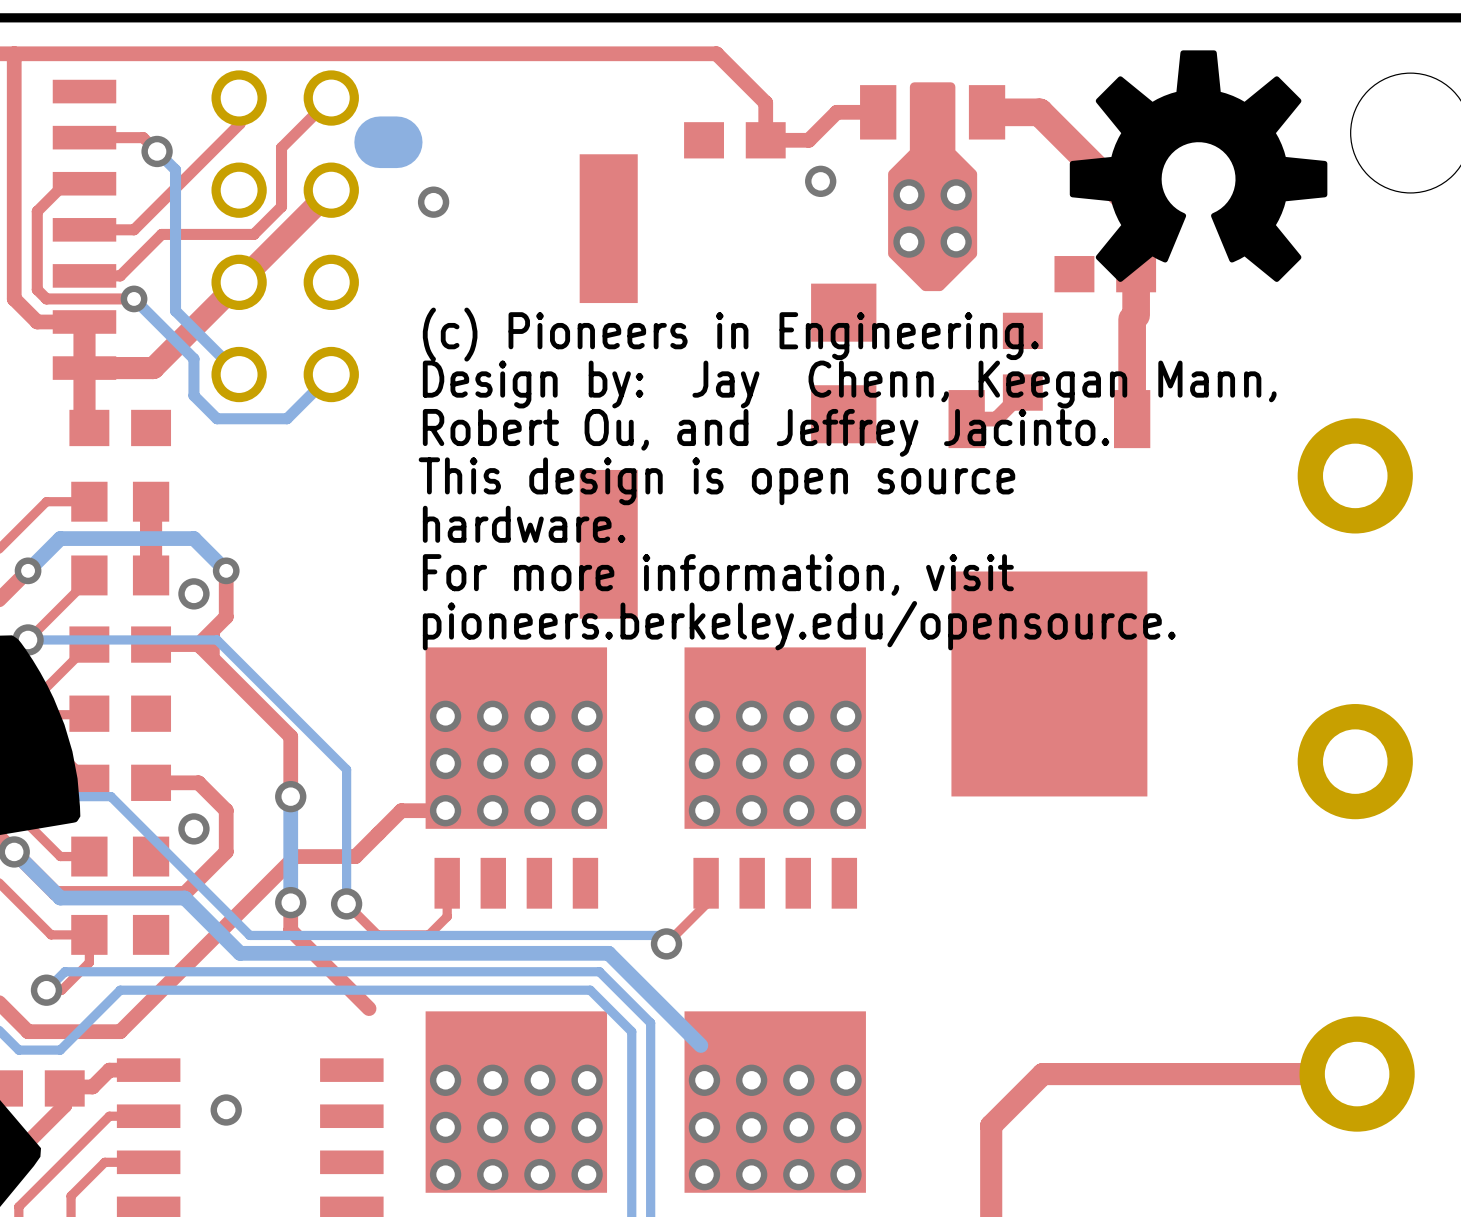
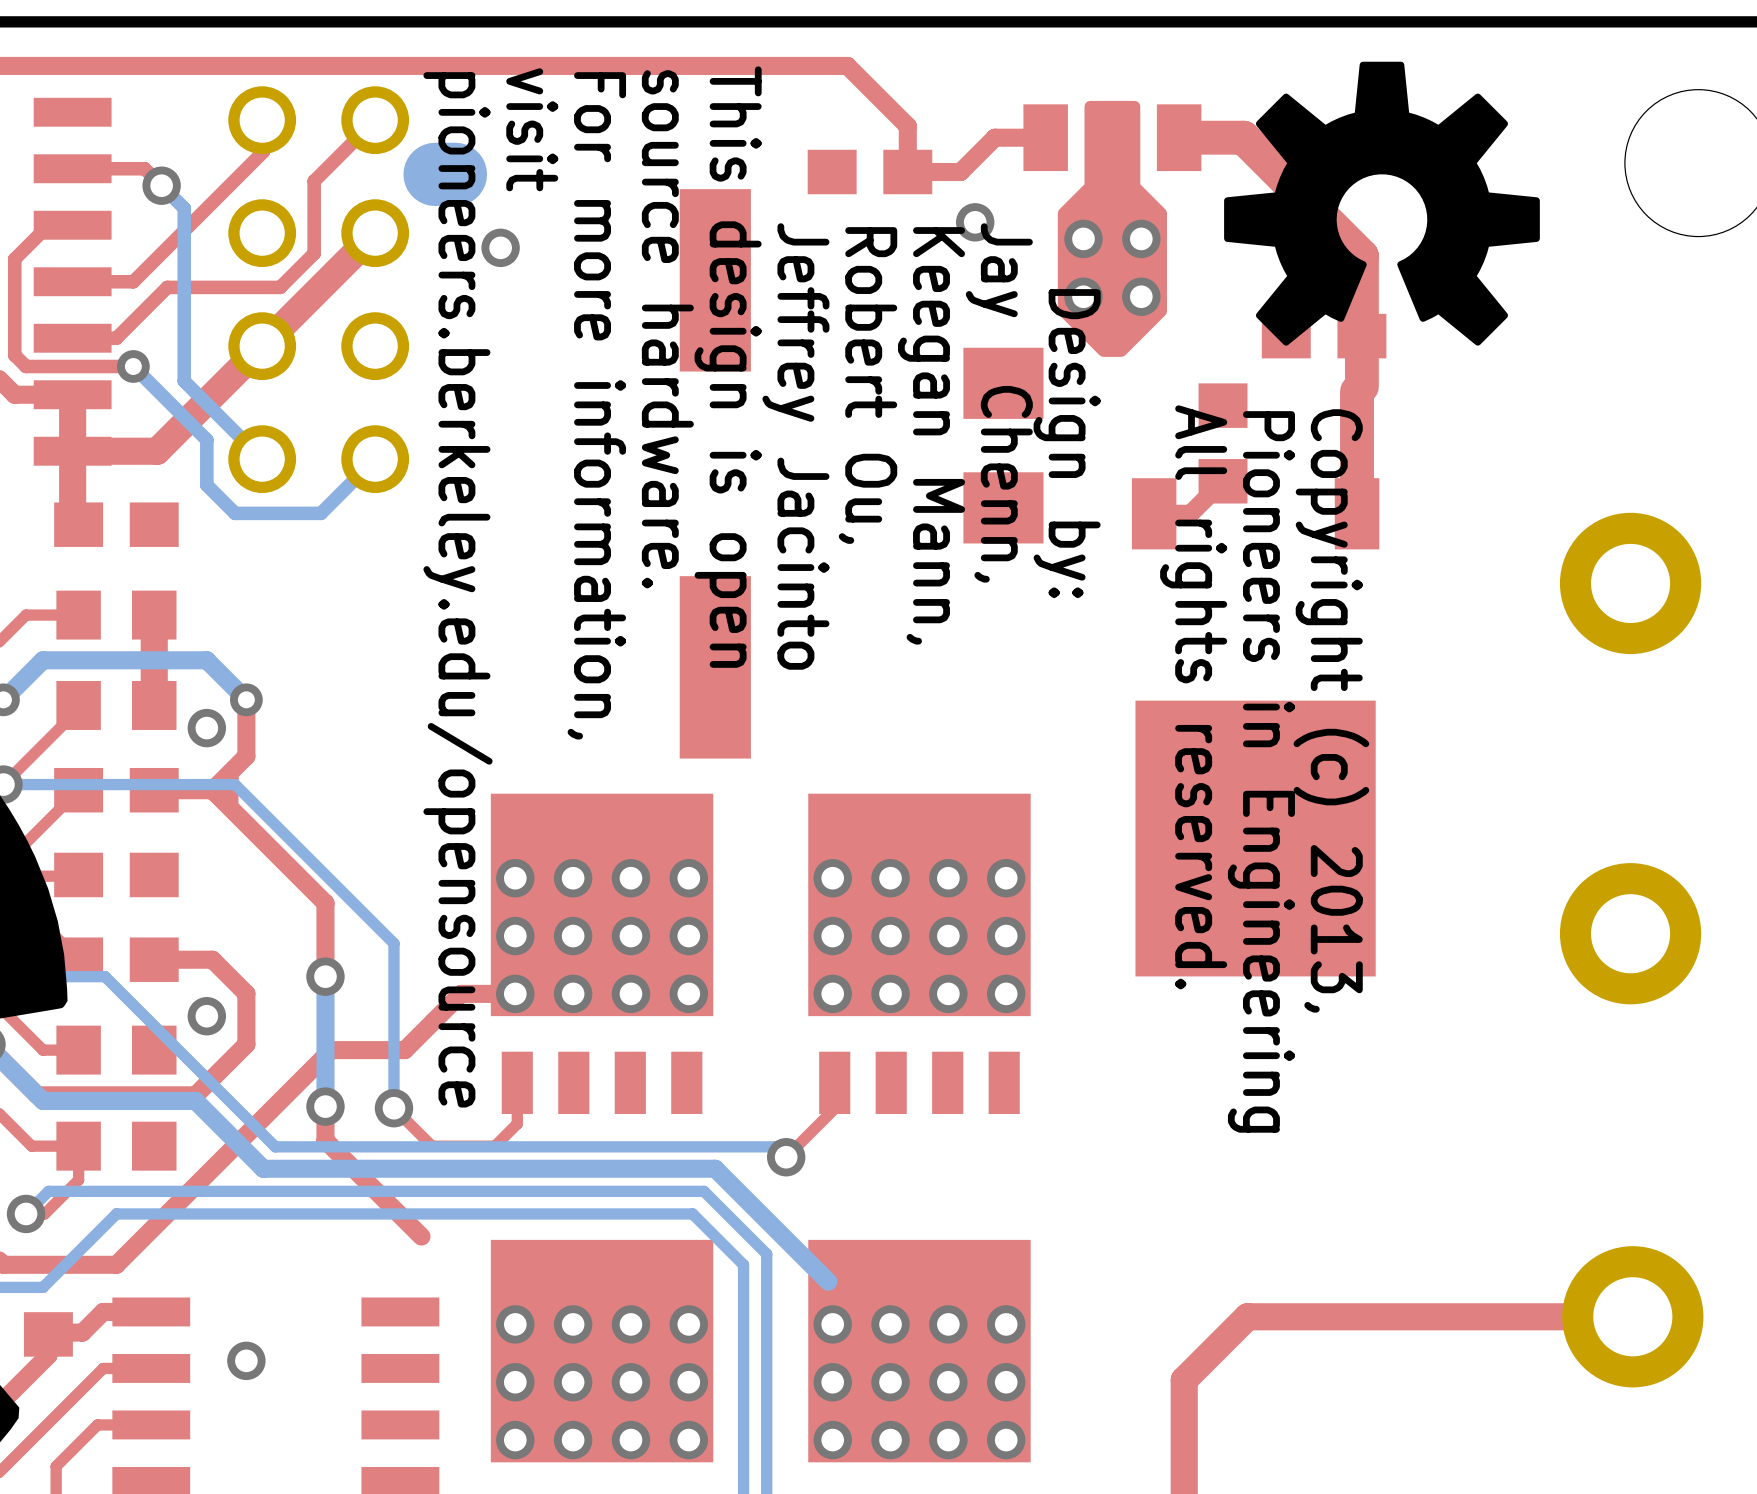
text: none -> visit (532, 129)
drawing position: (1198, 166) -> (1381, 203)
text: none -> Robert Ou, (868, 385)
text: none -> Jay Chenn, (999, 402)
text: (c) Pioneers in Engineering. (730, 334) -> Pioneers in Engineering (1261, 771)
text: none -> Design by: (1067, 443)
text: Design by: Jay Chenn, Keegan Mann, (849, 384) -> Keegan Mann, (931, 435)
text: Robert Ou, and Jeffrey Jacinto. (766, 432) -> Jeffrey Jacinto (795, 446)
text: This design is open source (716, 481) -> This design is open (728, 367)
text: hardware. (524, 524) -> source hardware. (667, 329)
text: none -> All rights reserved. (1193, 697)
text: For more information, visit (718, 574) -> For more information, (596, 405)
text: none -> Copyright (c) 2013, (1331, 710)
text: pioneers.berkeley.edu/opensource. (799, 625) -> pioneers.berkeley.edu/opensource (458, 589)

